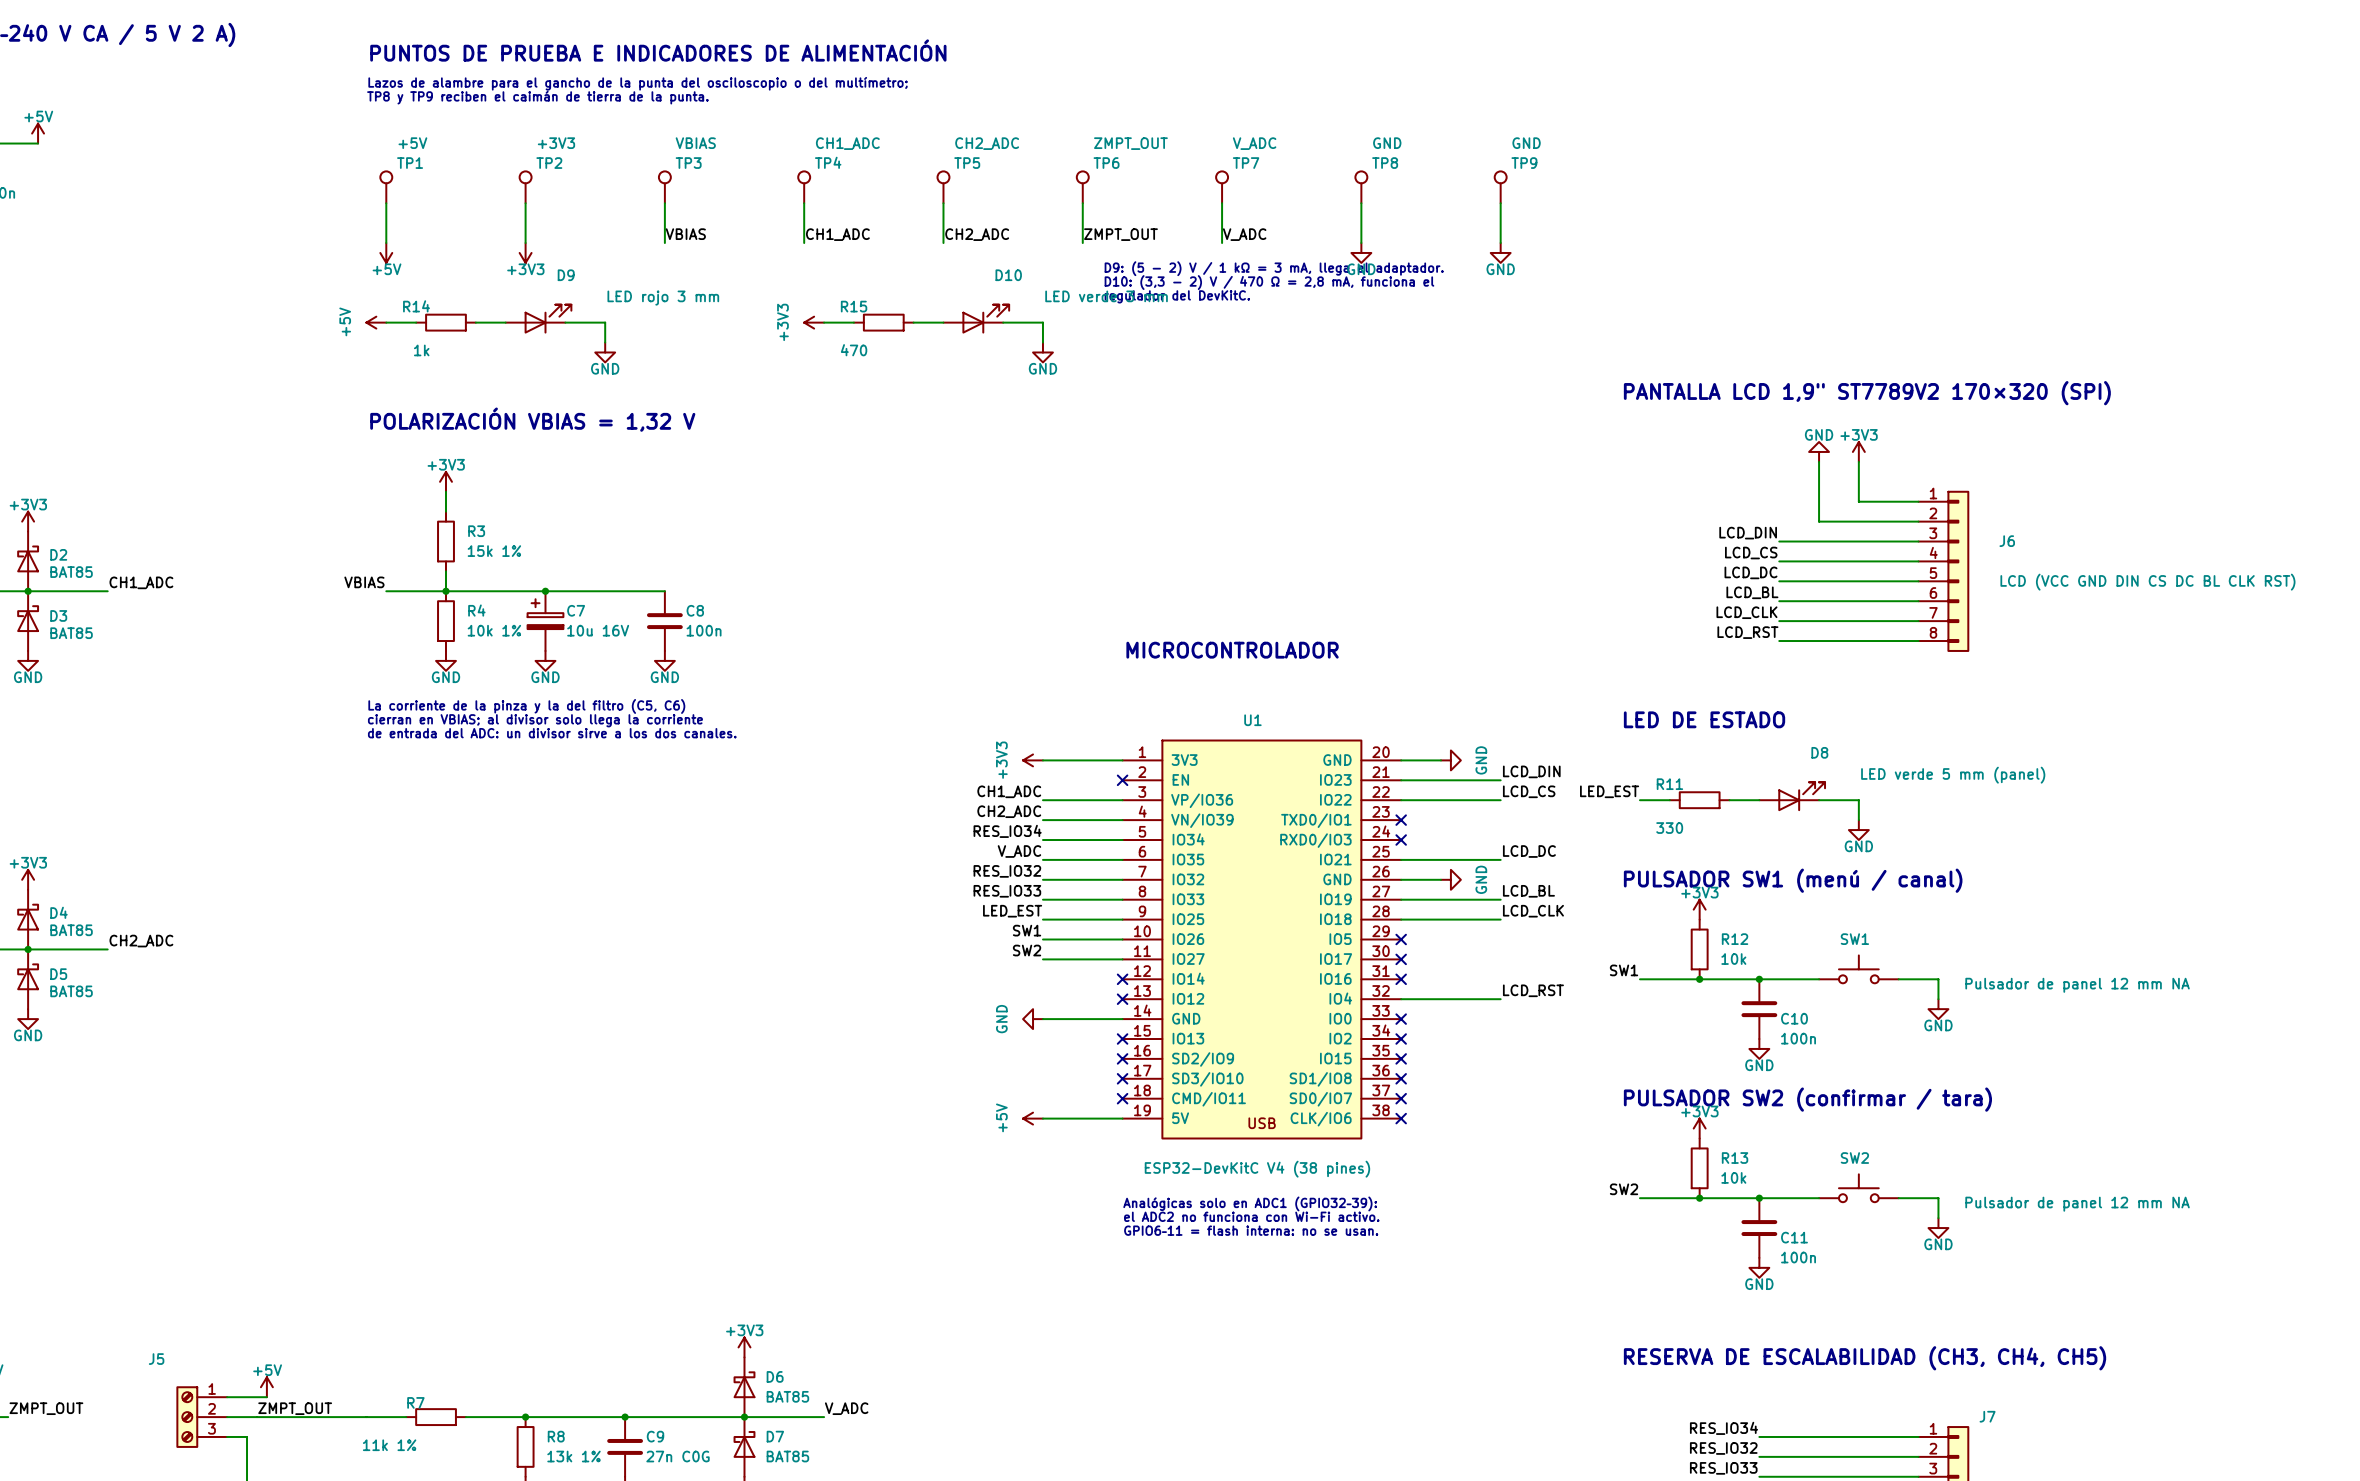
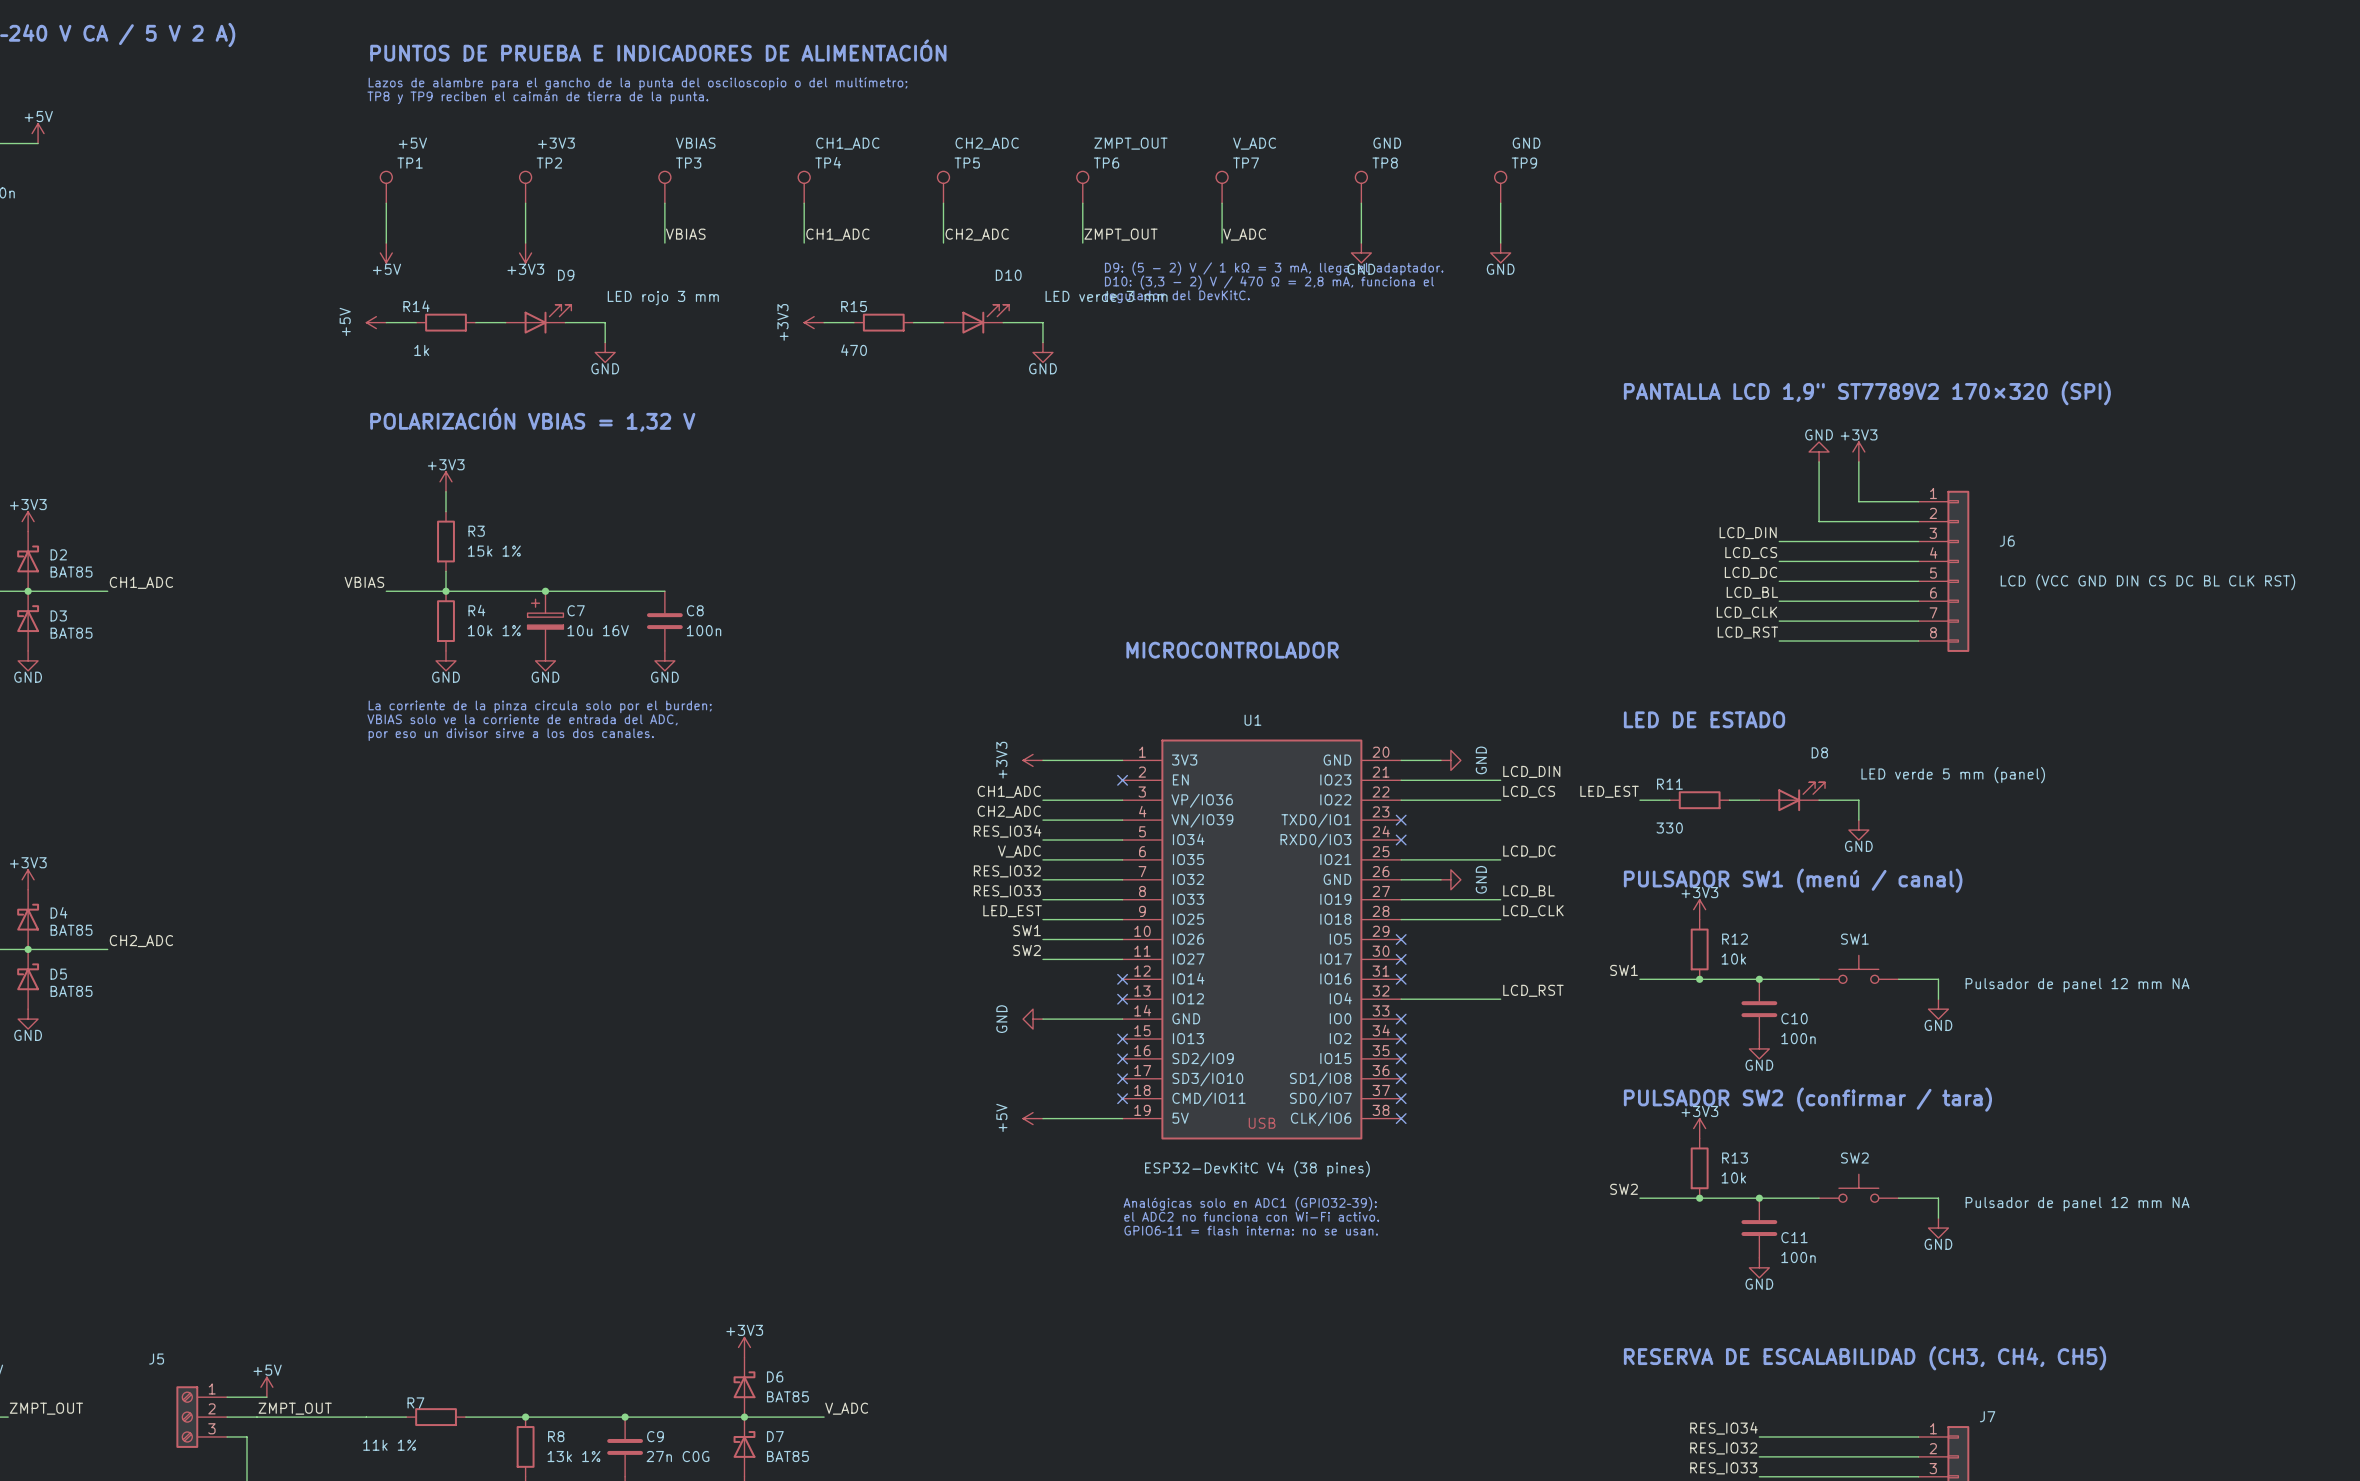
text: La corriente de la pinza y la del filtro (C5, C6) (526, 706) -> La corriente de la pinza circula solo por el burden; (540, 706)
text: cierran en VBIAS; al divisor solo llega la corriente (535, 720) -> VBIAS solo ve la corriente de entrada del ADC, (522, 719)
text: de entrada del ADC: un divisor sirve a los dos canales. (552, 733) -> por eso un divisor sirve a los dos canales. (511, 734)

